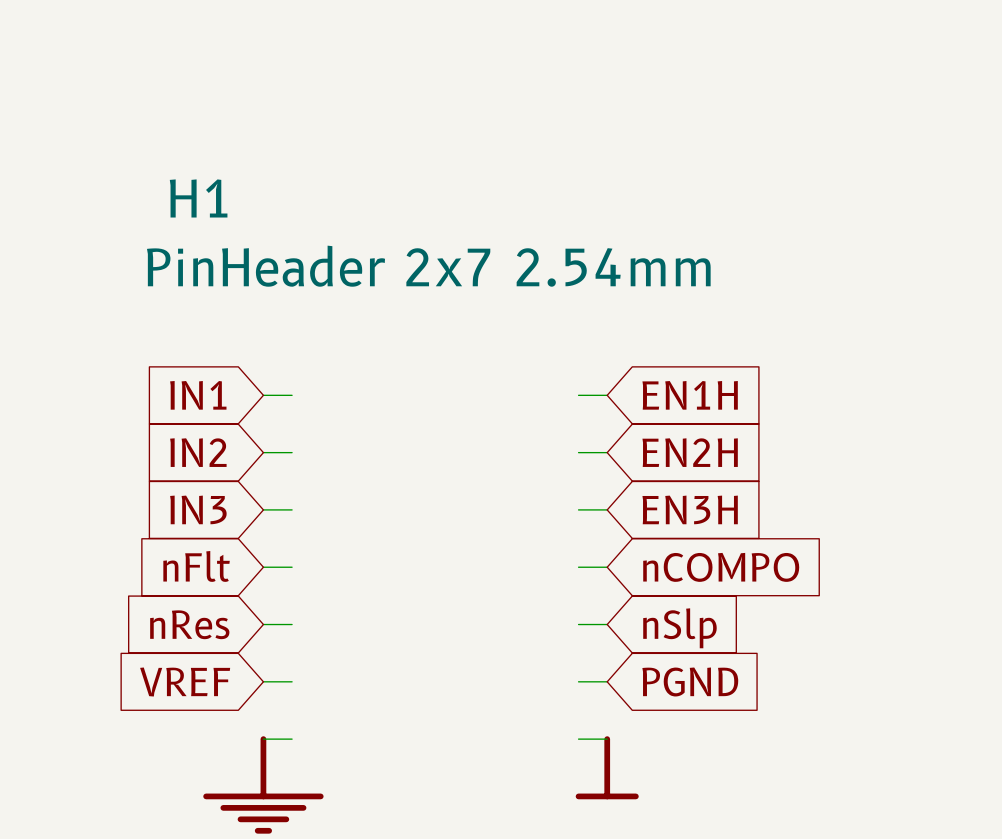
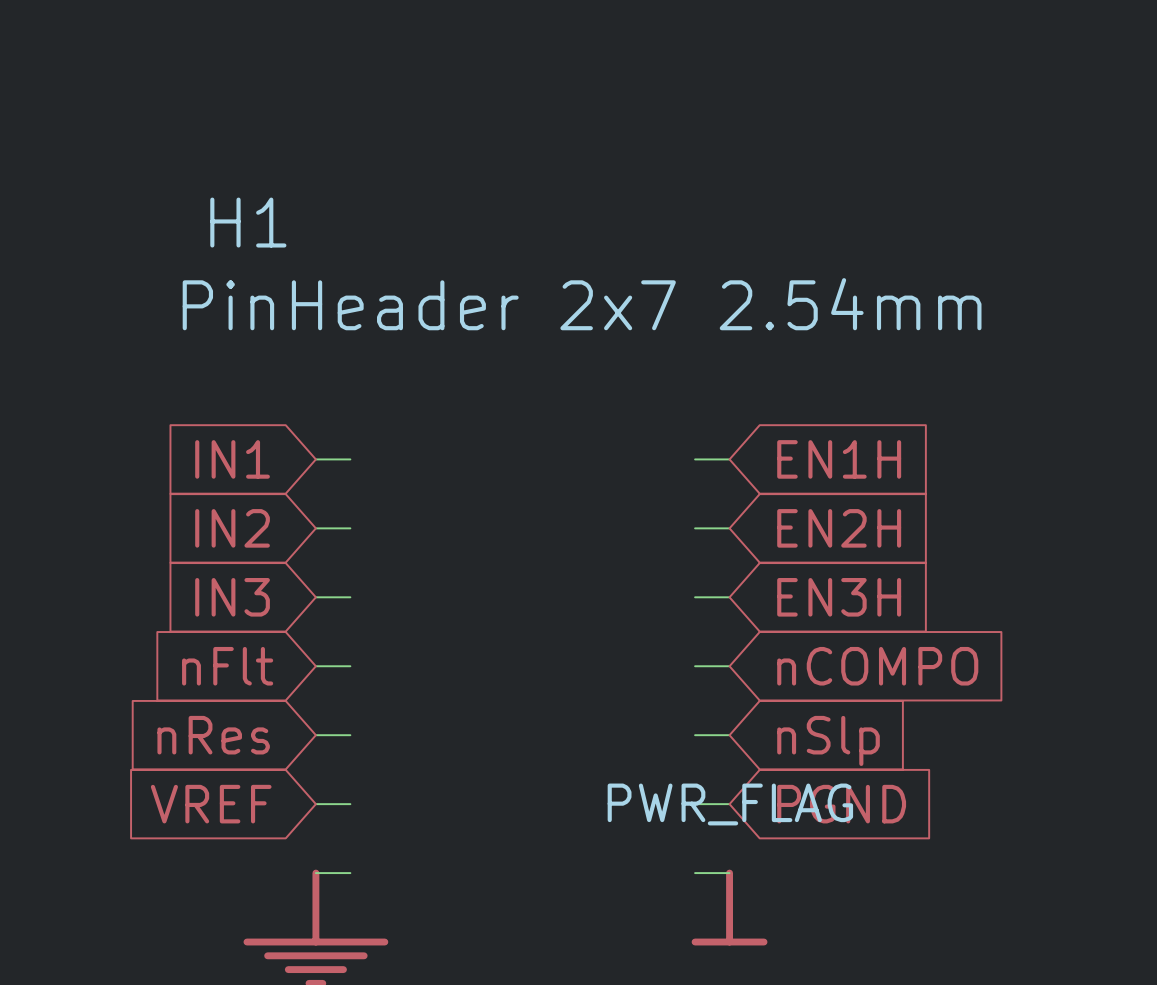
power symbol: none -> PWR_FLAG (730, 804)

